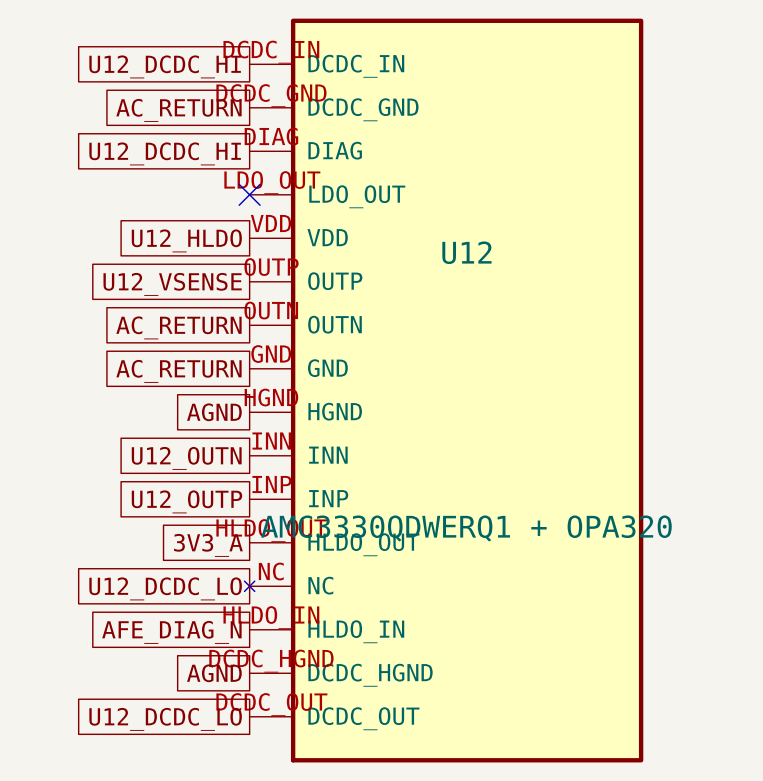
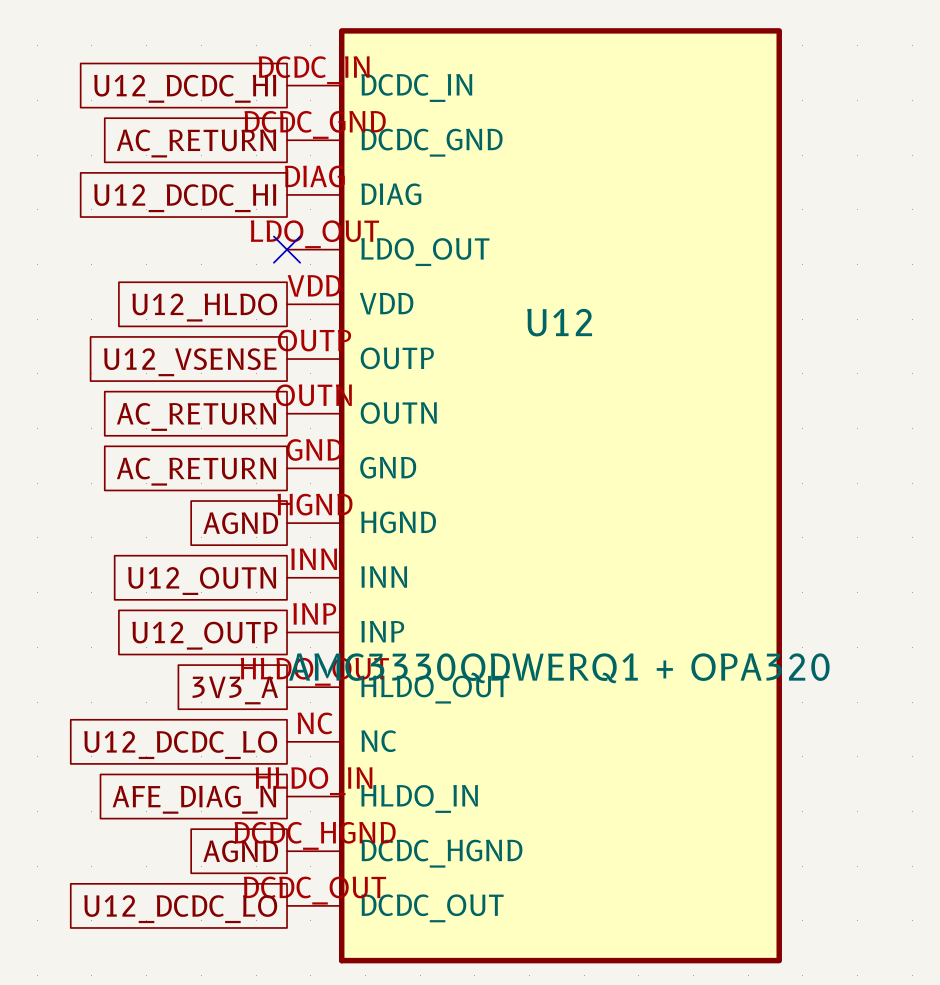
U12 symbol: [244, 18, 644, 763] -> [287, 28, 782, 964]

